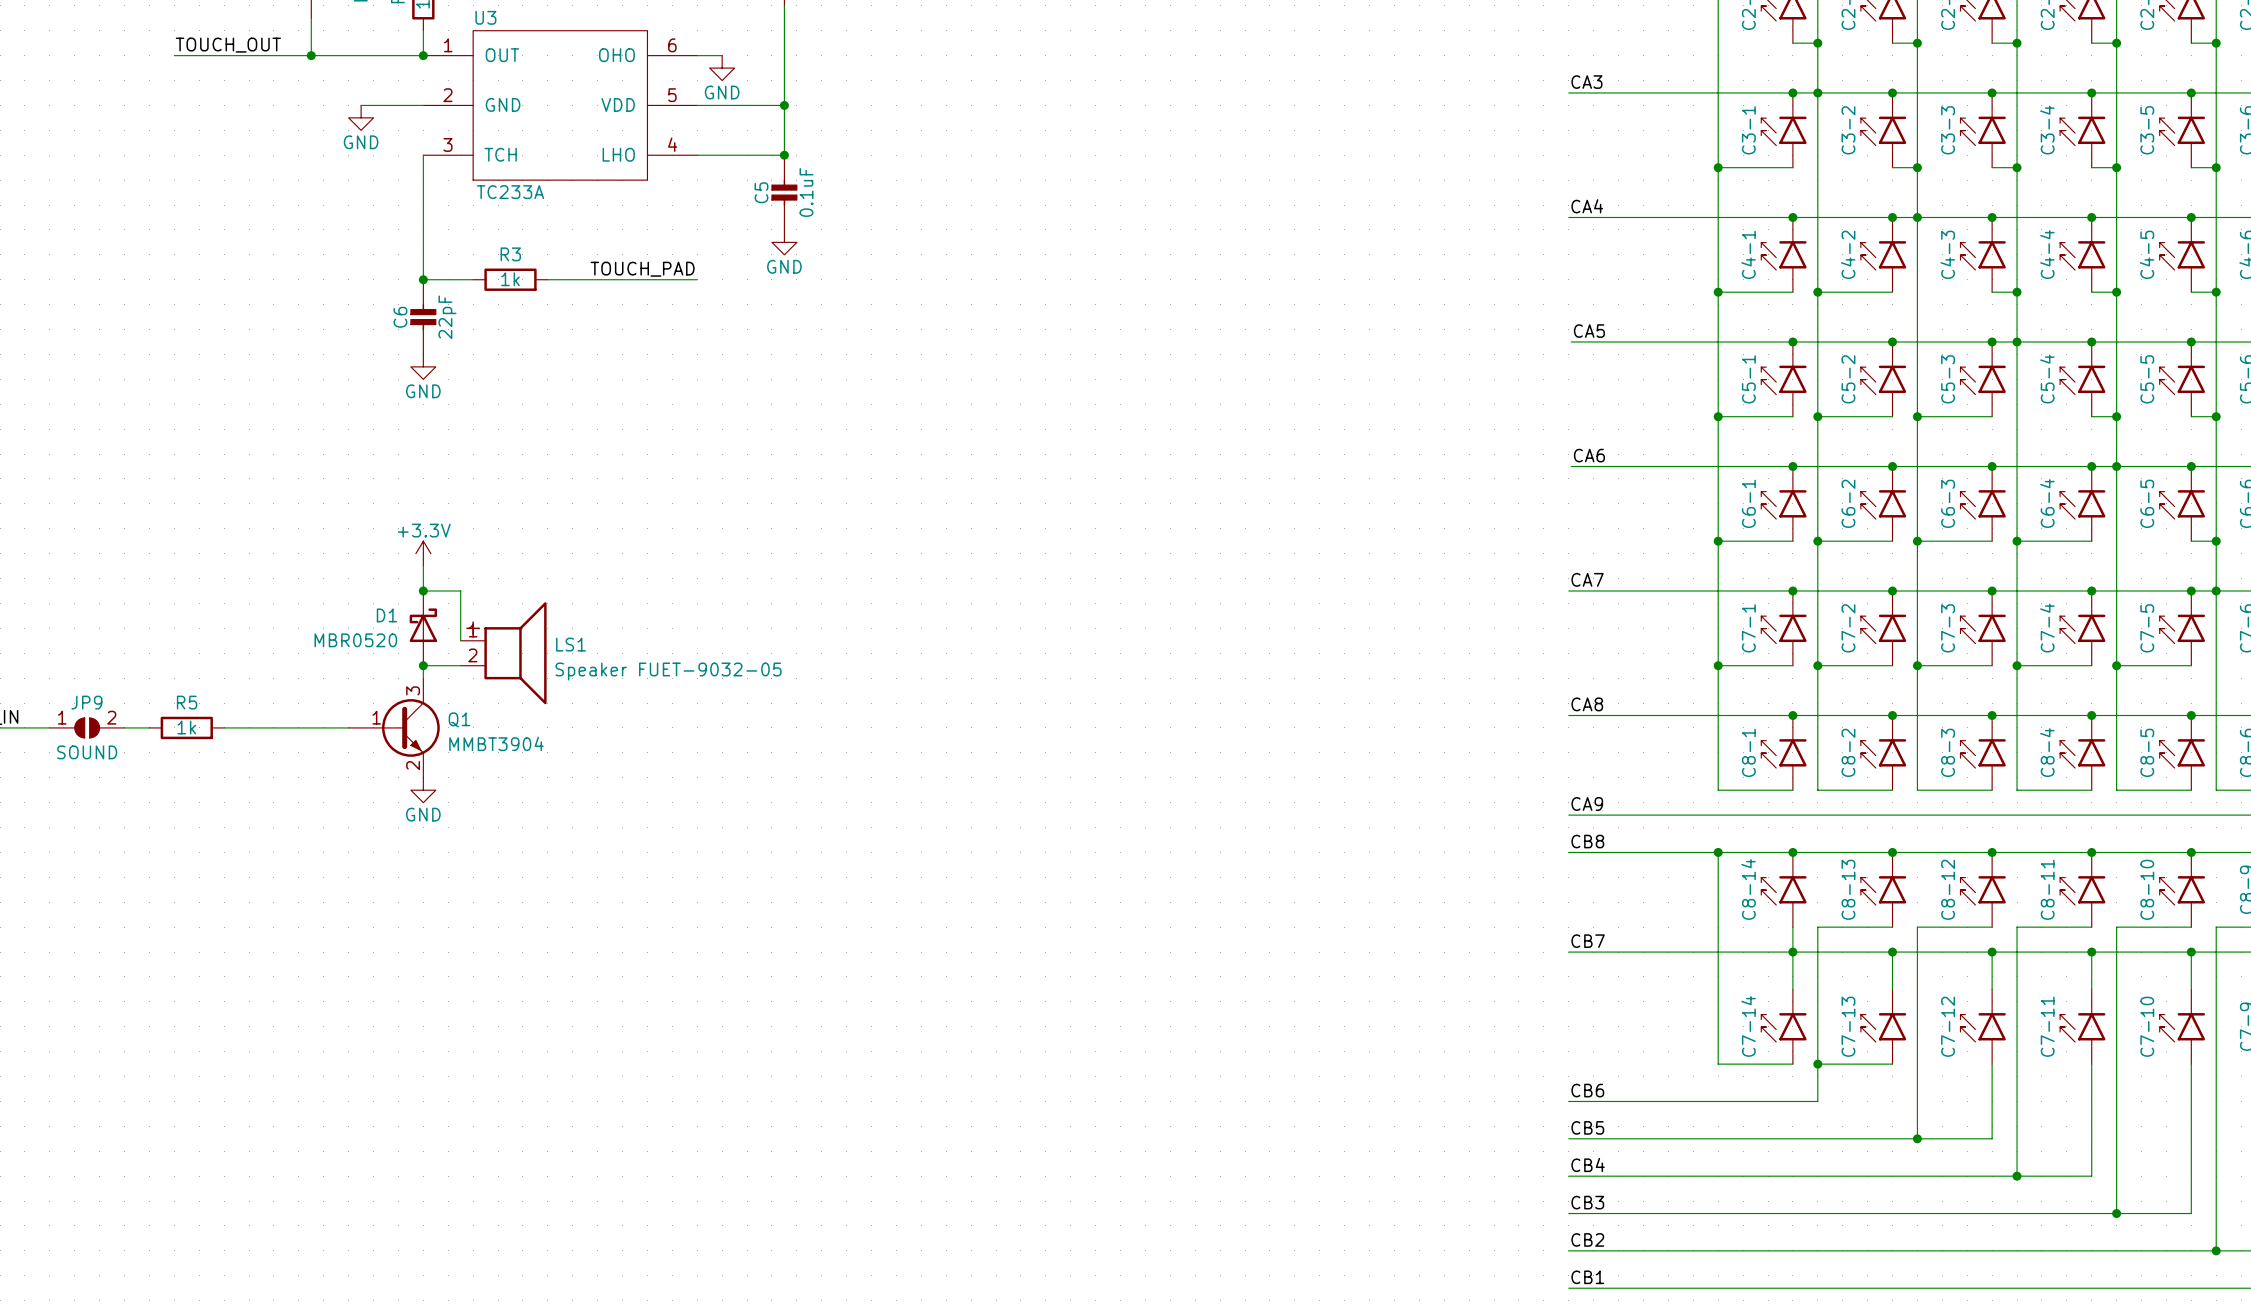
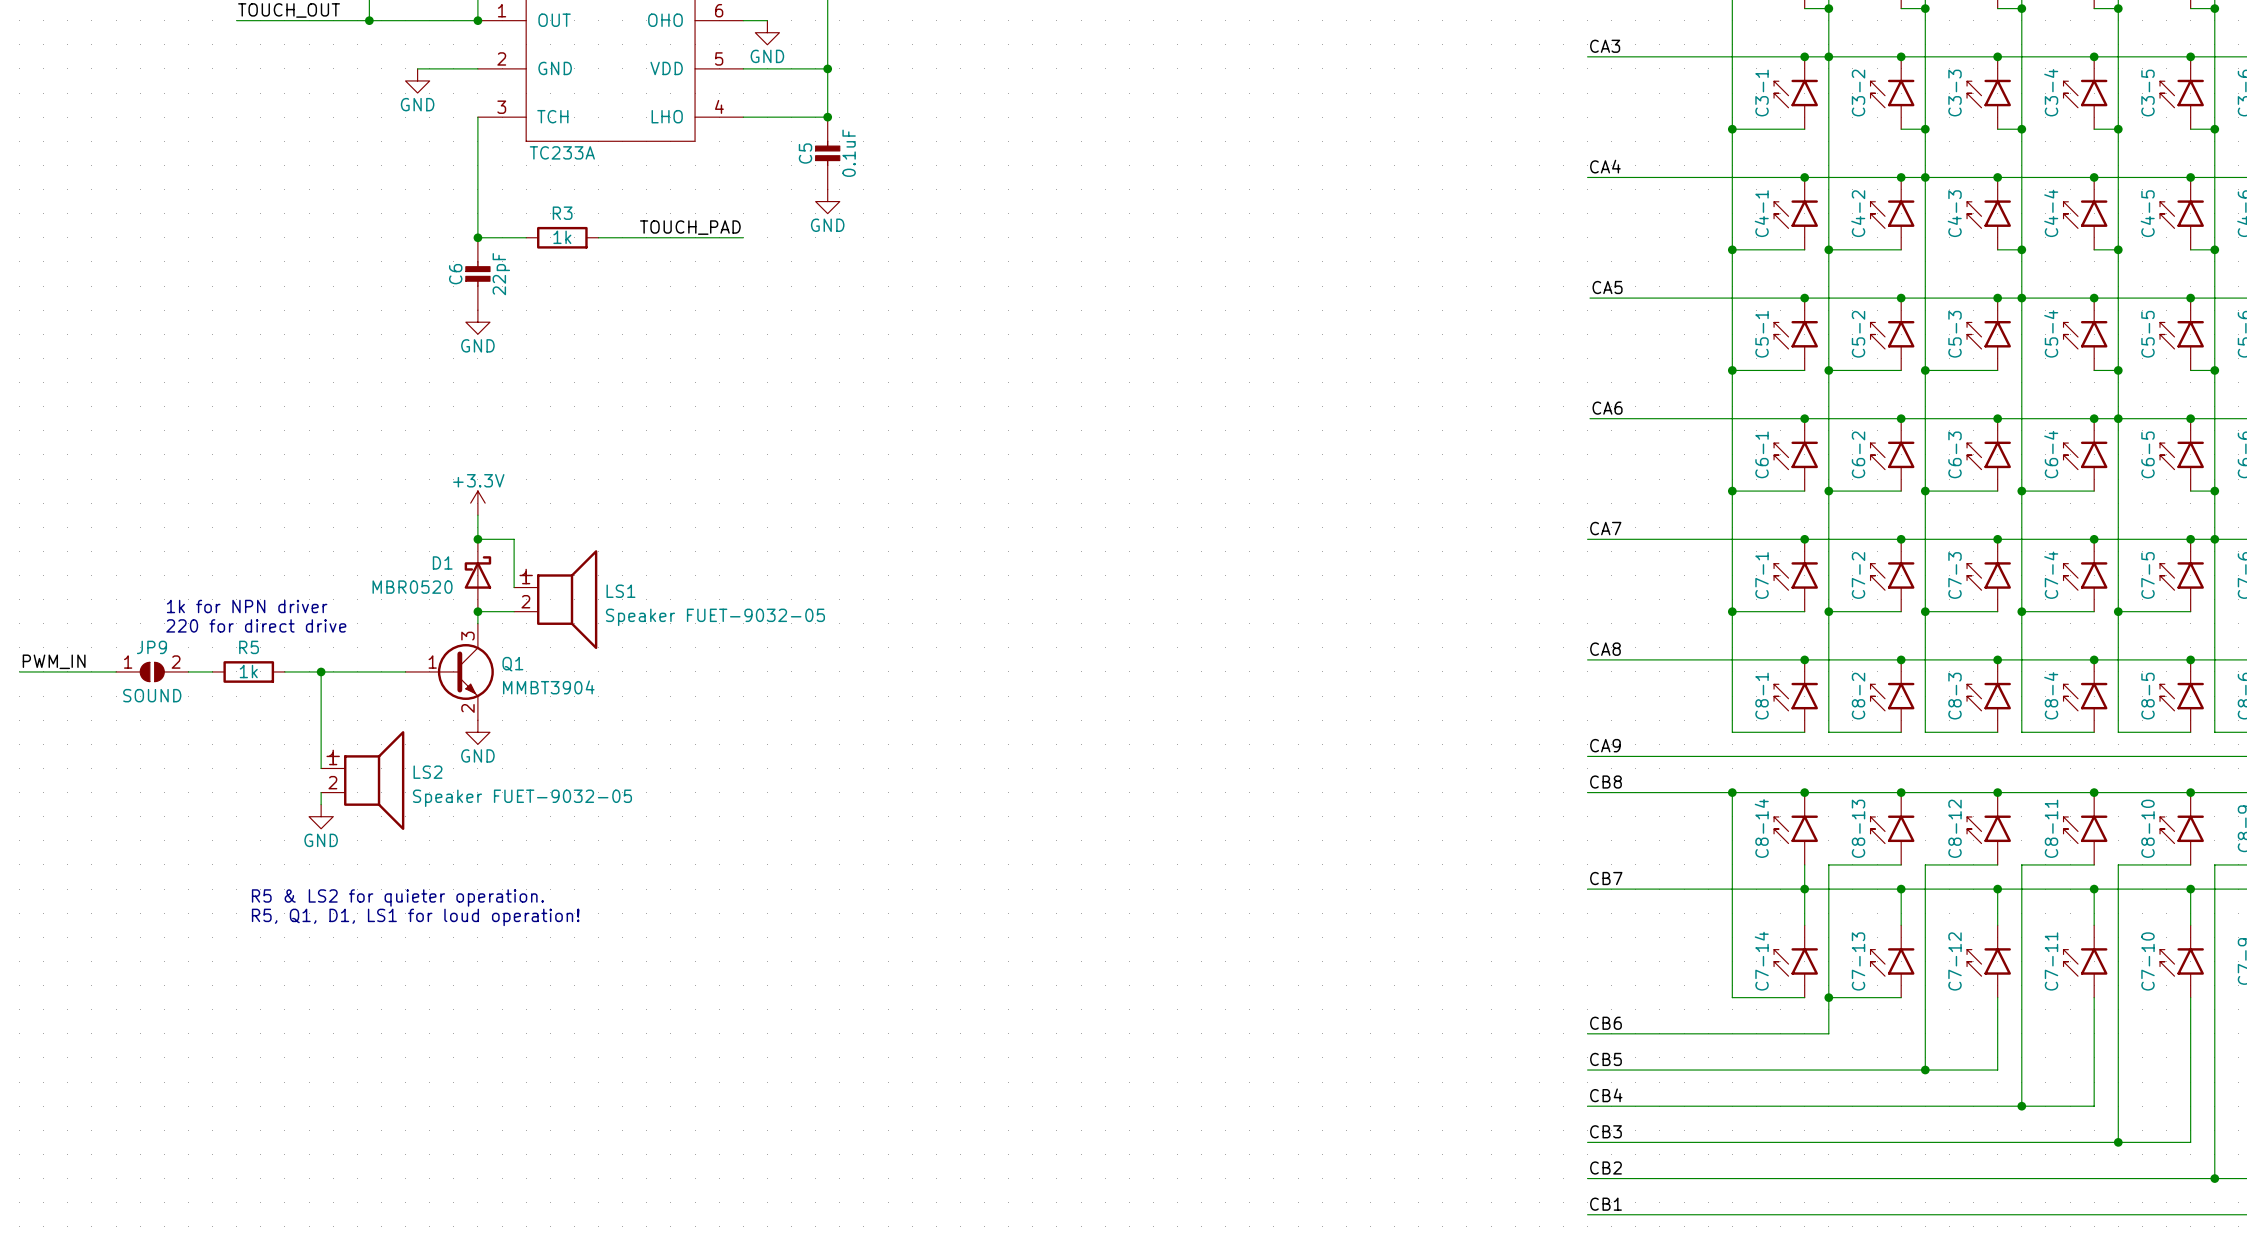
text: none -> 1k for NPN driver (247, 606)
text: none -> 220 for direct drive (256, 625)
wire: none -> (321, 671) (321, 768)
junction: none -> (321, 671)
LS2: none -> Speaker FUET-9032-05 (362, 780)
wire: none -> (321, 792) (321, 804)
power symbol: none -> GND (321, 816)
text: none -> R5 & LS2 for quieter operation. (397, 897)
text: none -> R5, Q1, D1, LS1 for loud operation! (415, 917)

